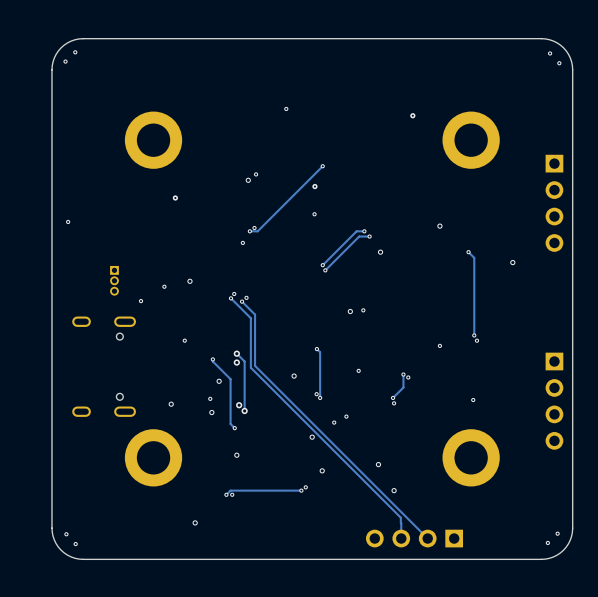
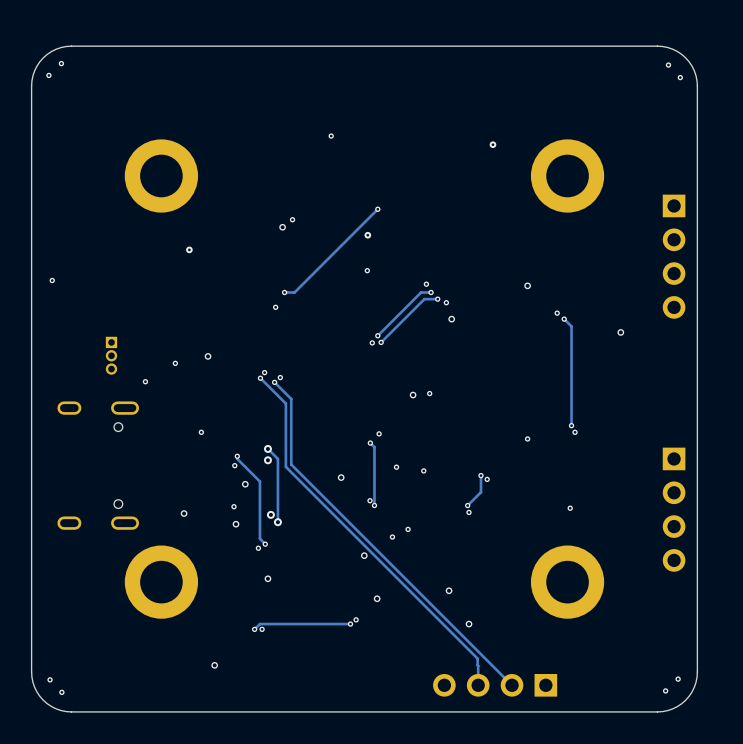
via: none -> (426, 284)
via: (254, 228) -> none
via: none -> (446, 302)
via: none -> (557, 313)
via: none -> (372, 342)
via: none -> (379, 433)
via: none -> (234, 465)
via: none -> (396, 467)
via: none -> (258, 548)

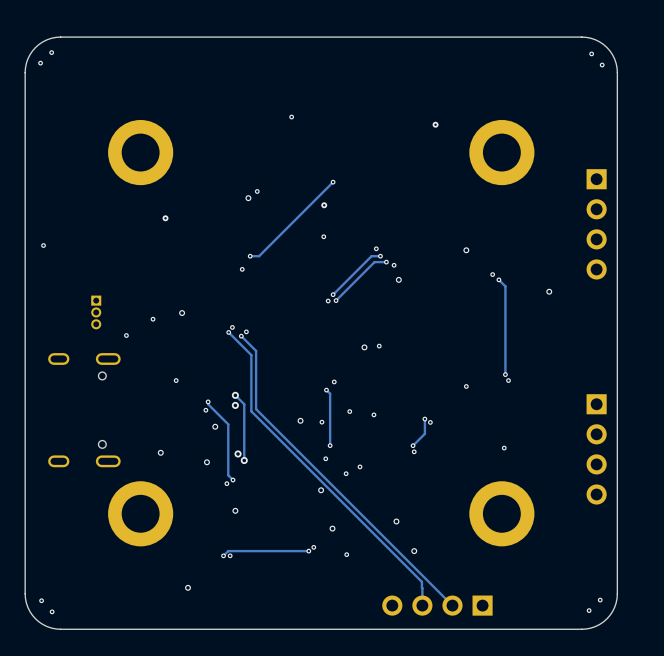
via: none -> (321, 422)
via: (370, 500) -> none
via: (233, 506) -> none
via: none -> (325, 458)
via: none -> (346, 554)

